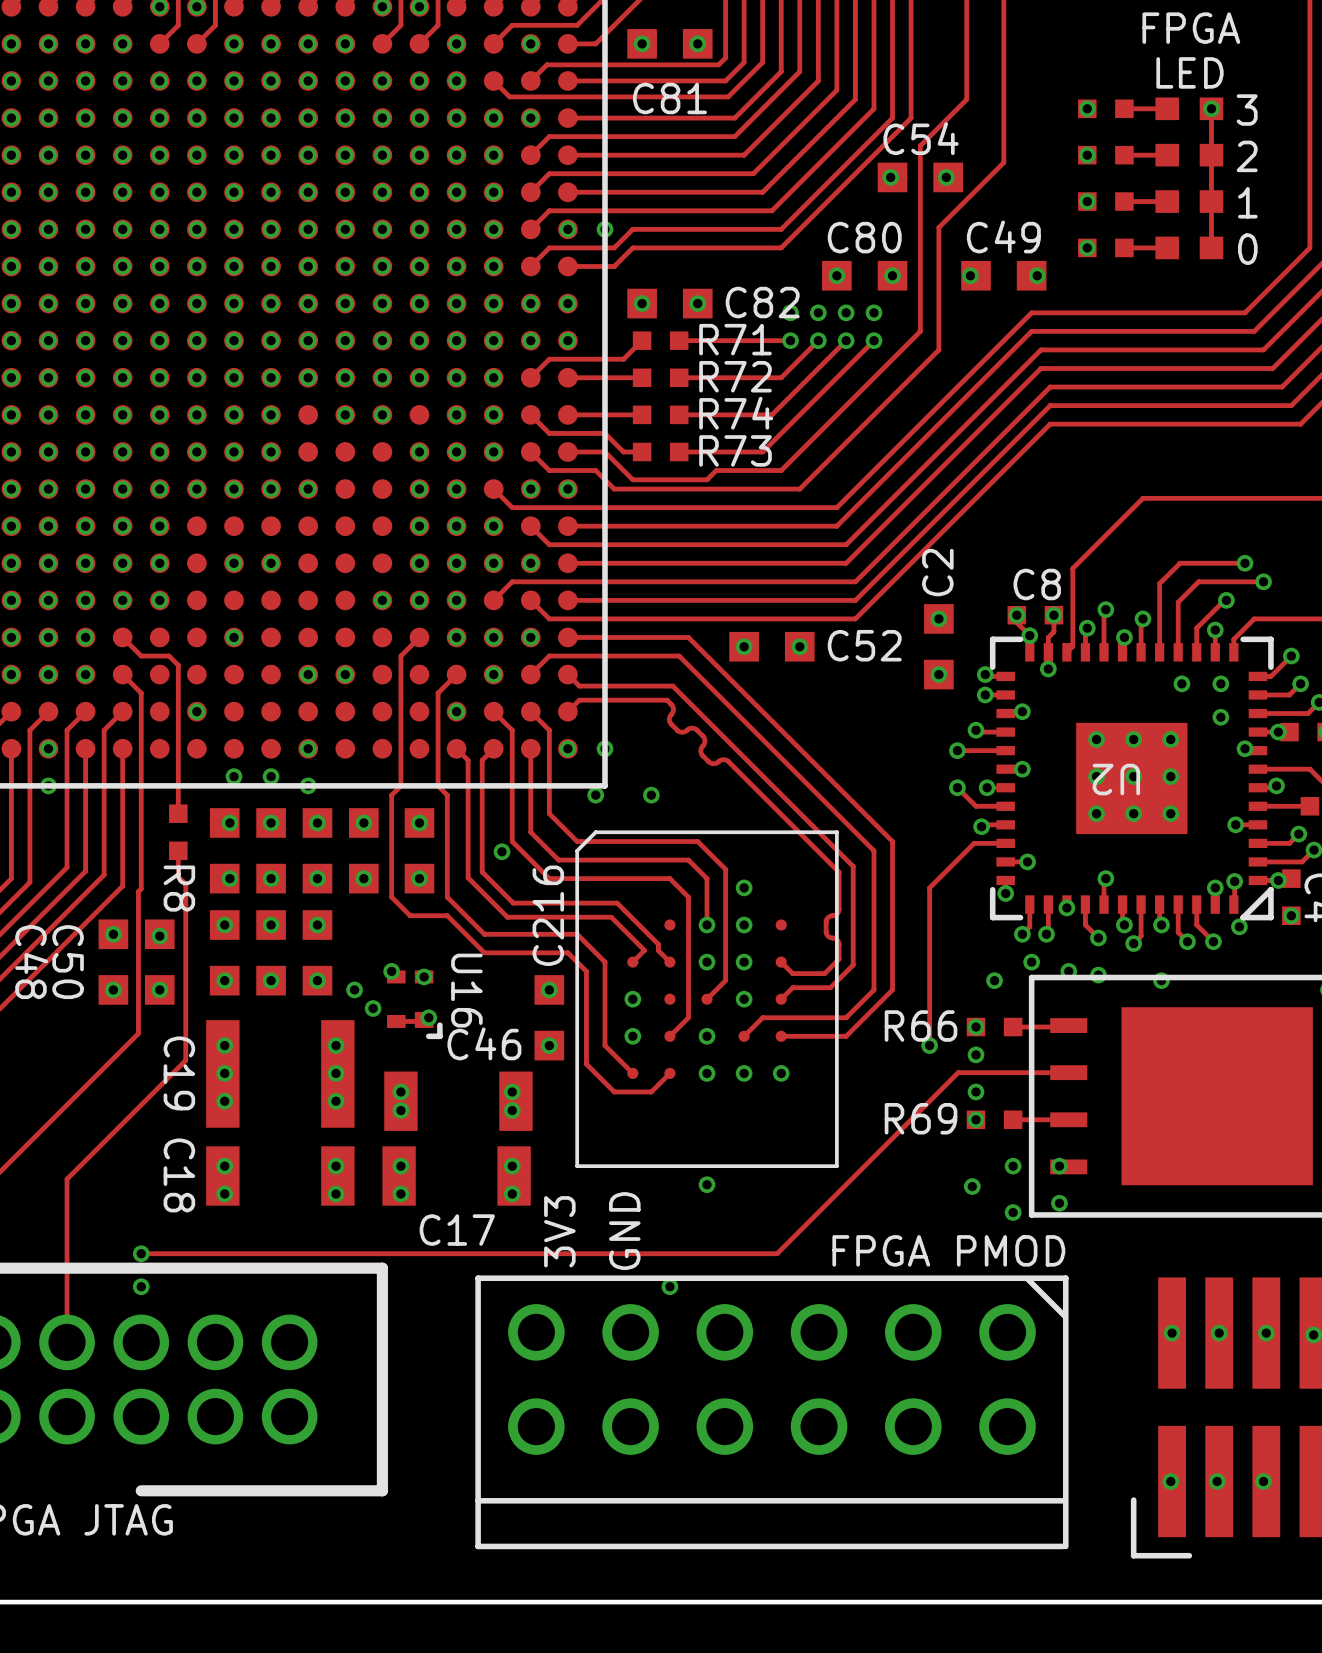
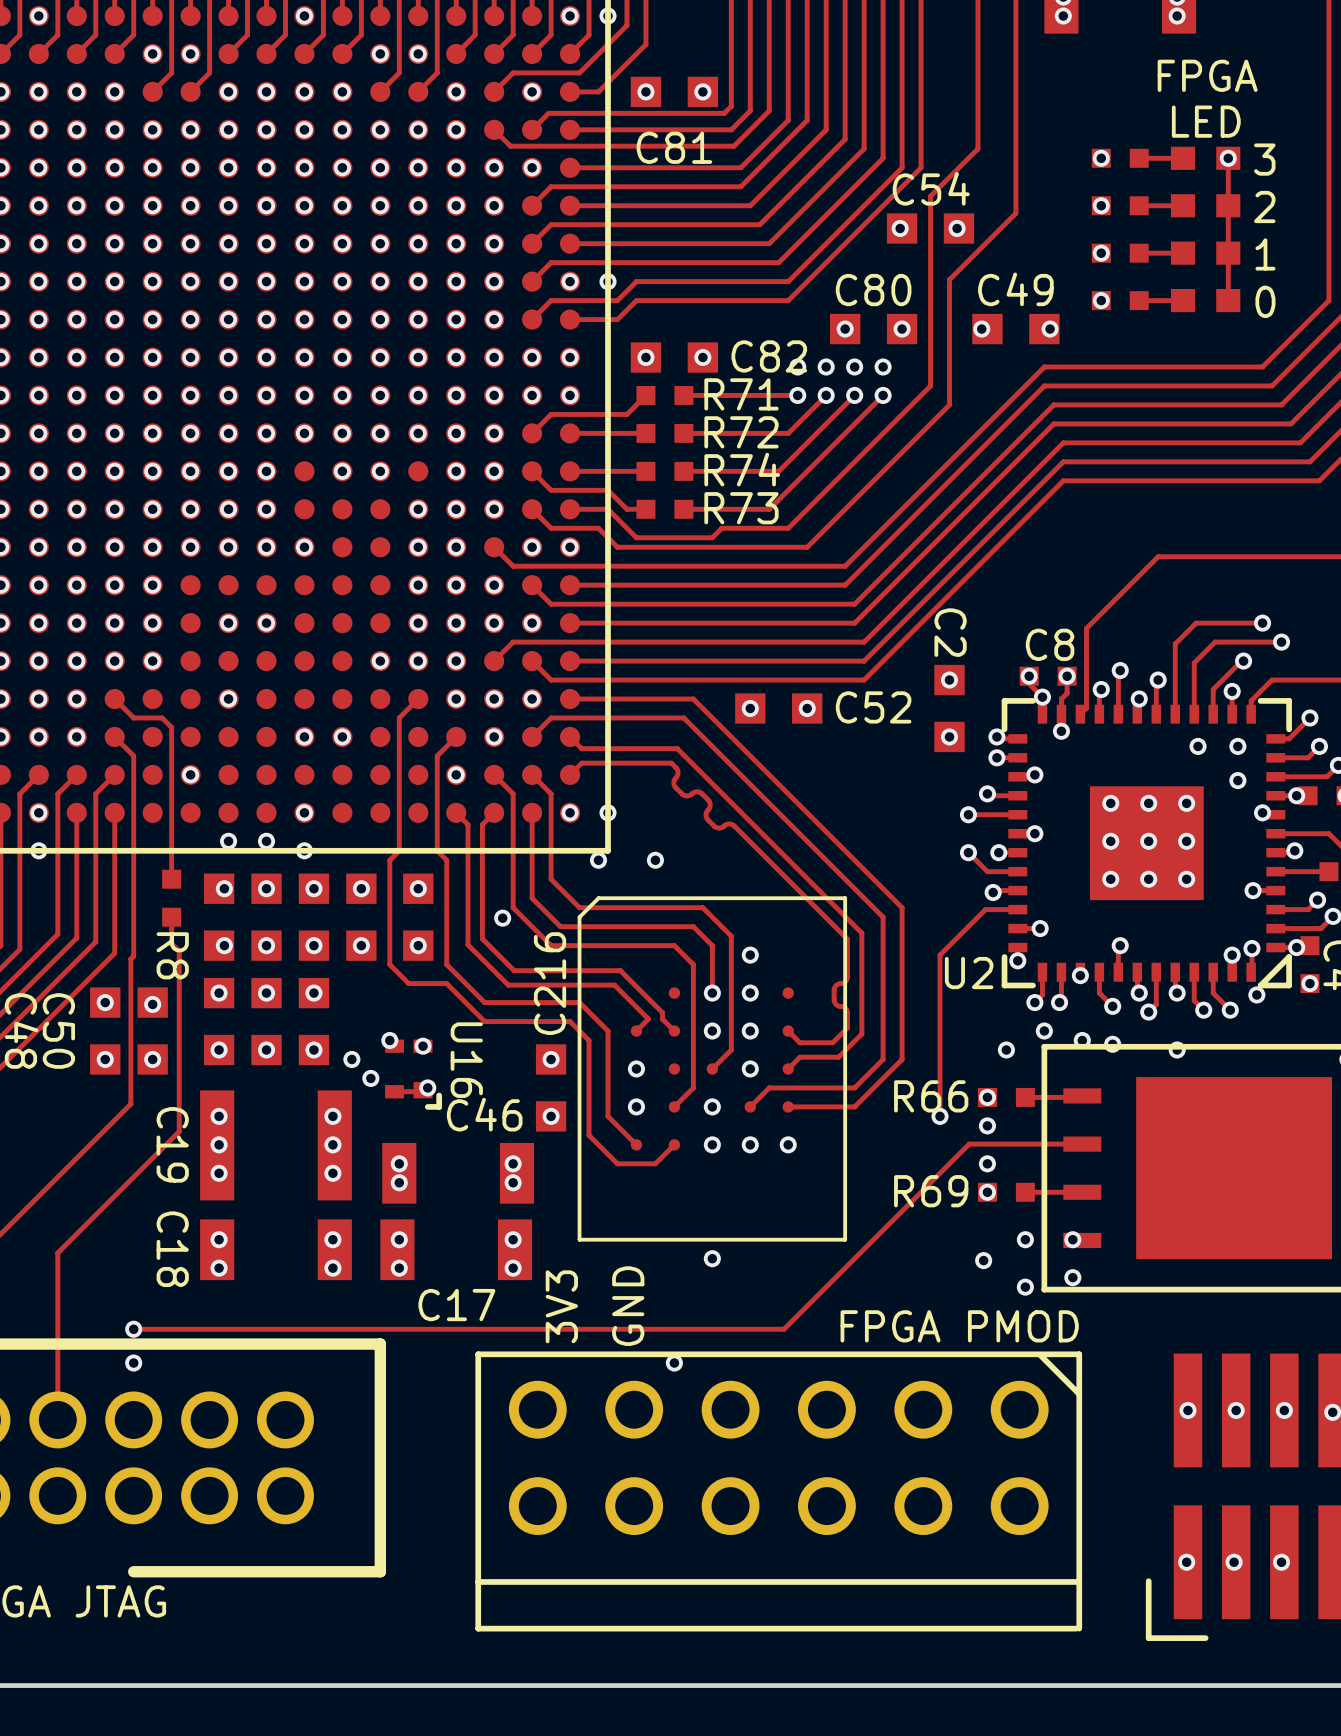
C2 name rotation: 0° (937, 572) -> 180° (950, 632)
U2 name rotation: 0° (1116, 779) -> 180° (969, 973)
U2 name position: U2 (1116, 779) -> U2 (969, 973)

